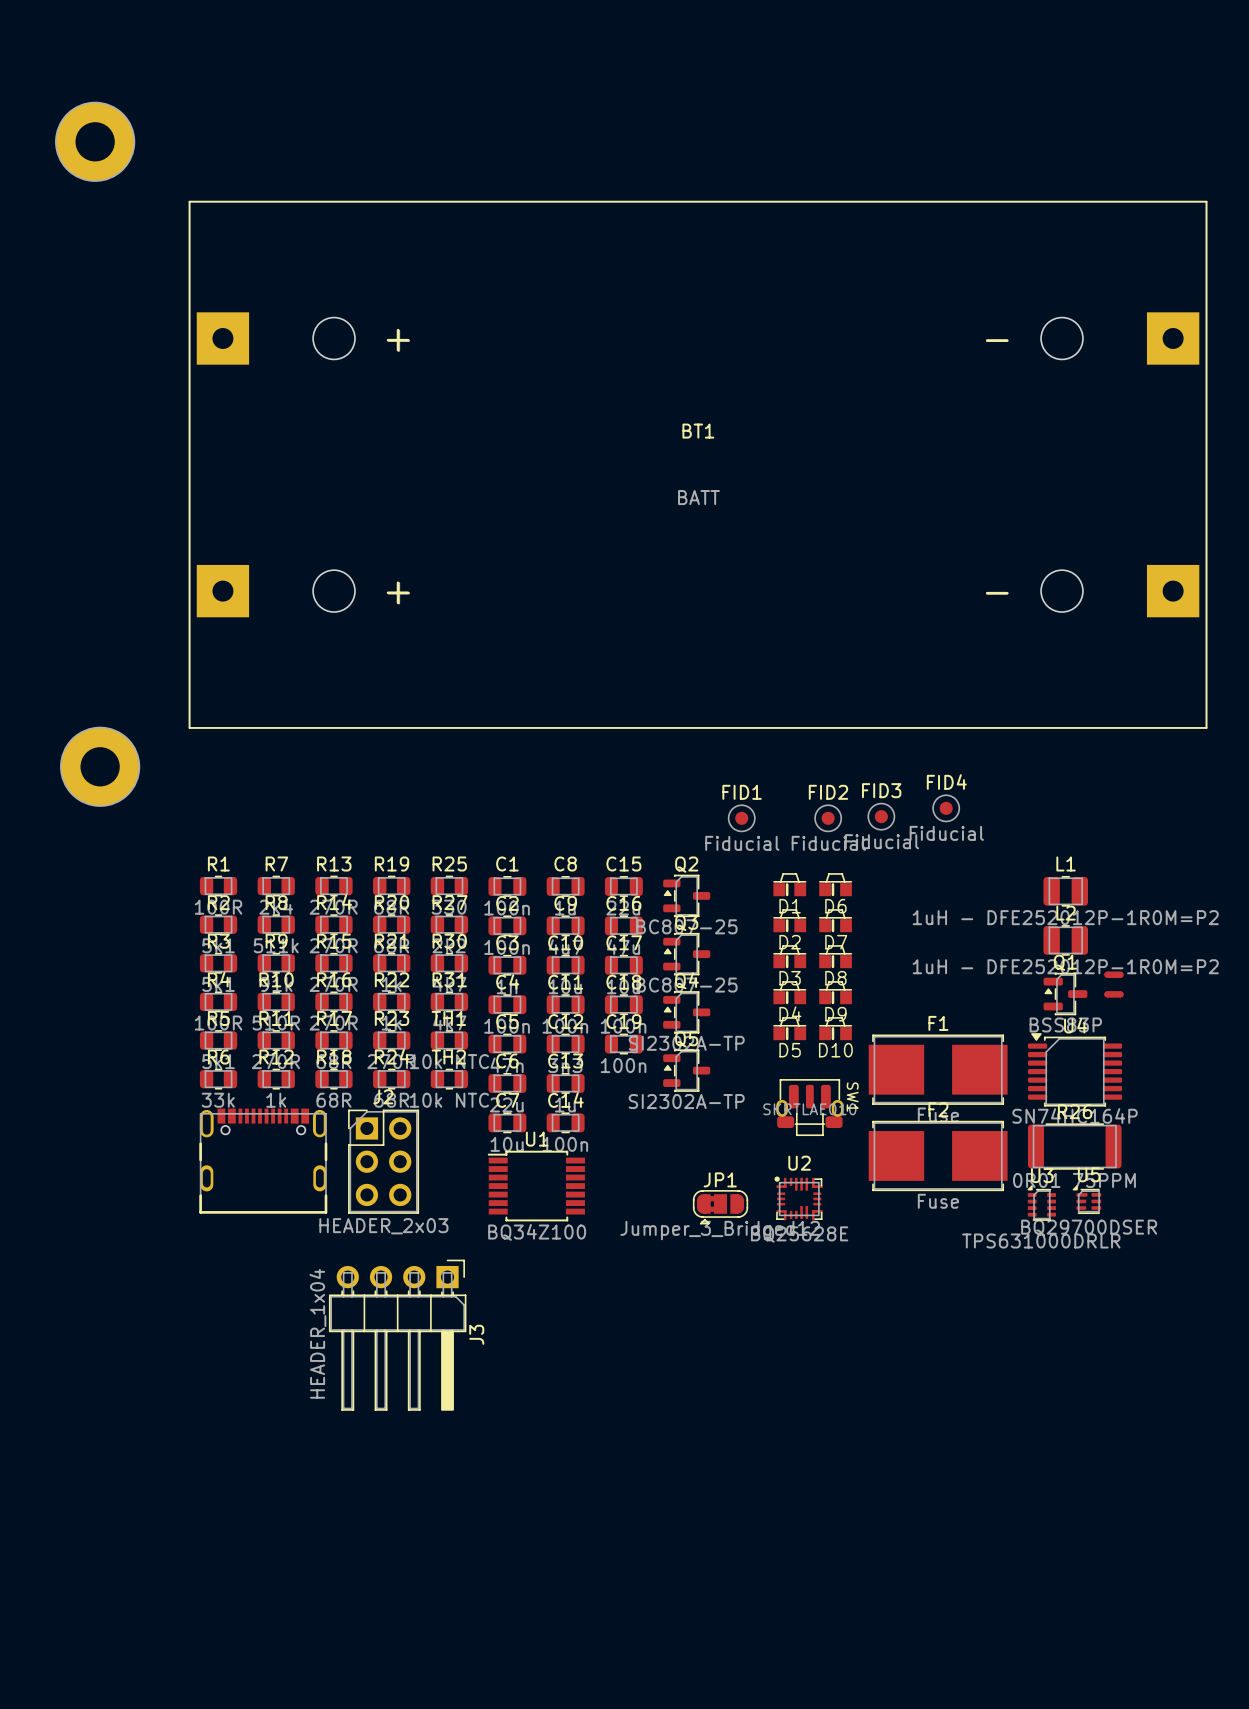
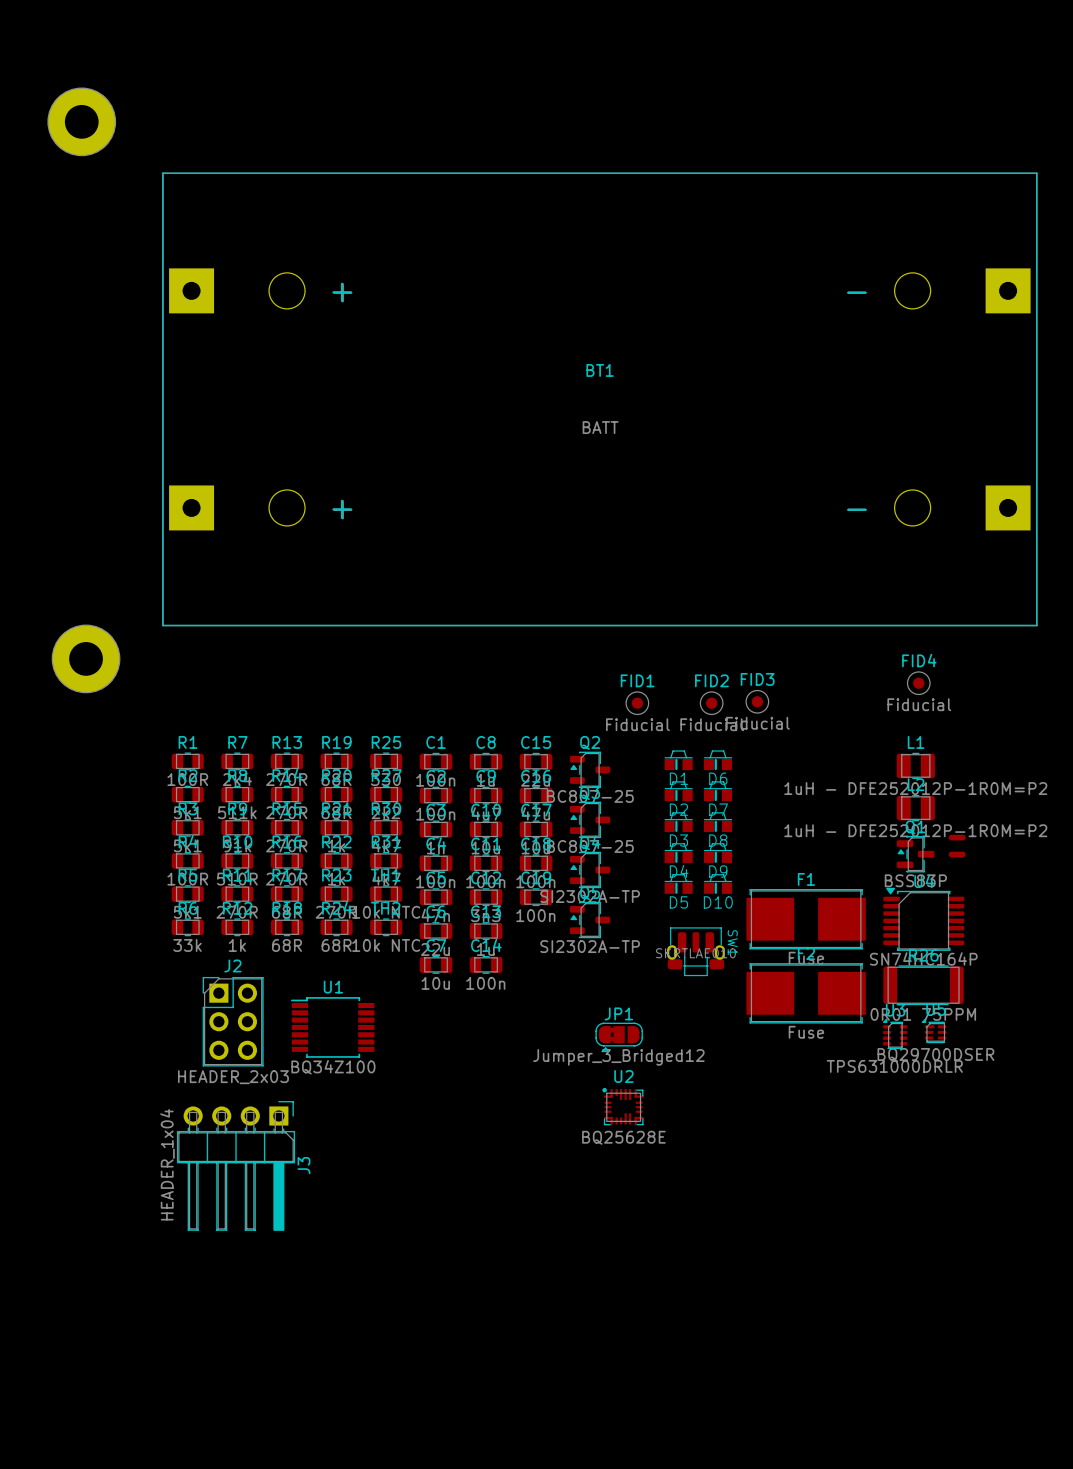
FID4 position: (946, 808) -> (918, 683)
part: (263, 1161) -> none
J2 position: (383, 1161) -> (233, 1021)
U1 position: (536, 1186) -> (332, 1027)
U2 position: (798, 1198) -> (623, 1106)
J3 position: (397, 1335) -> (236, 1165)

